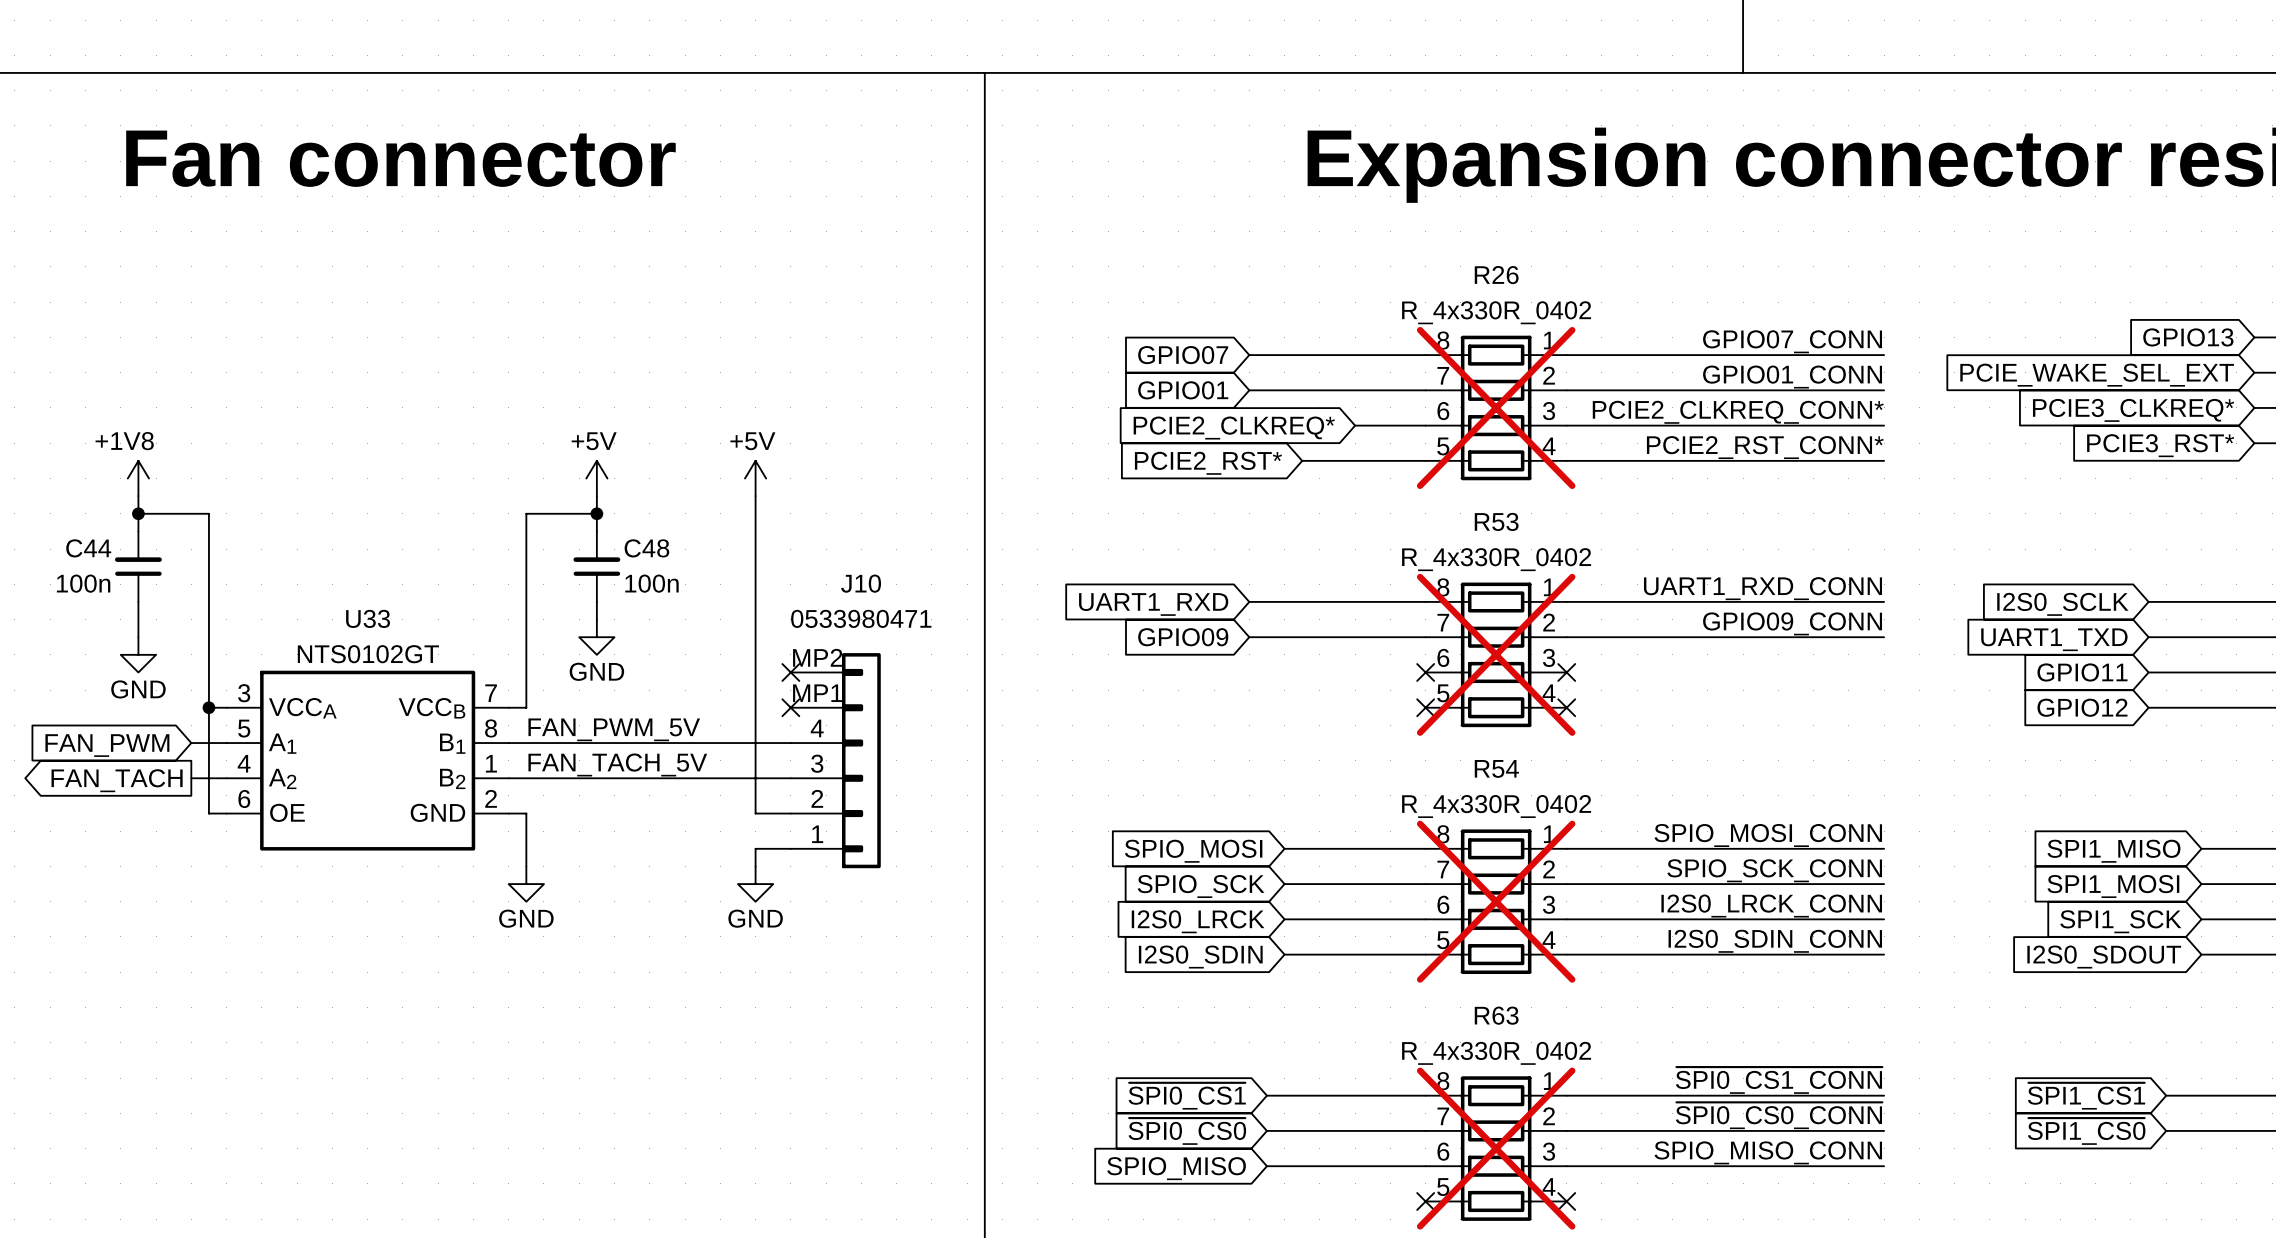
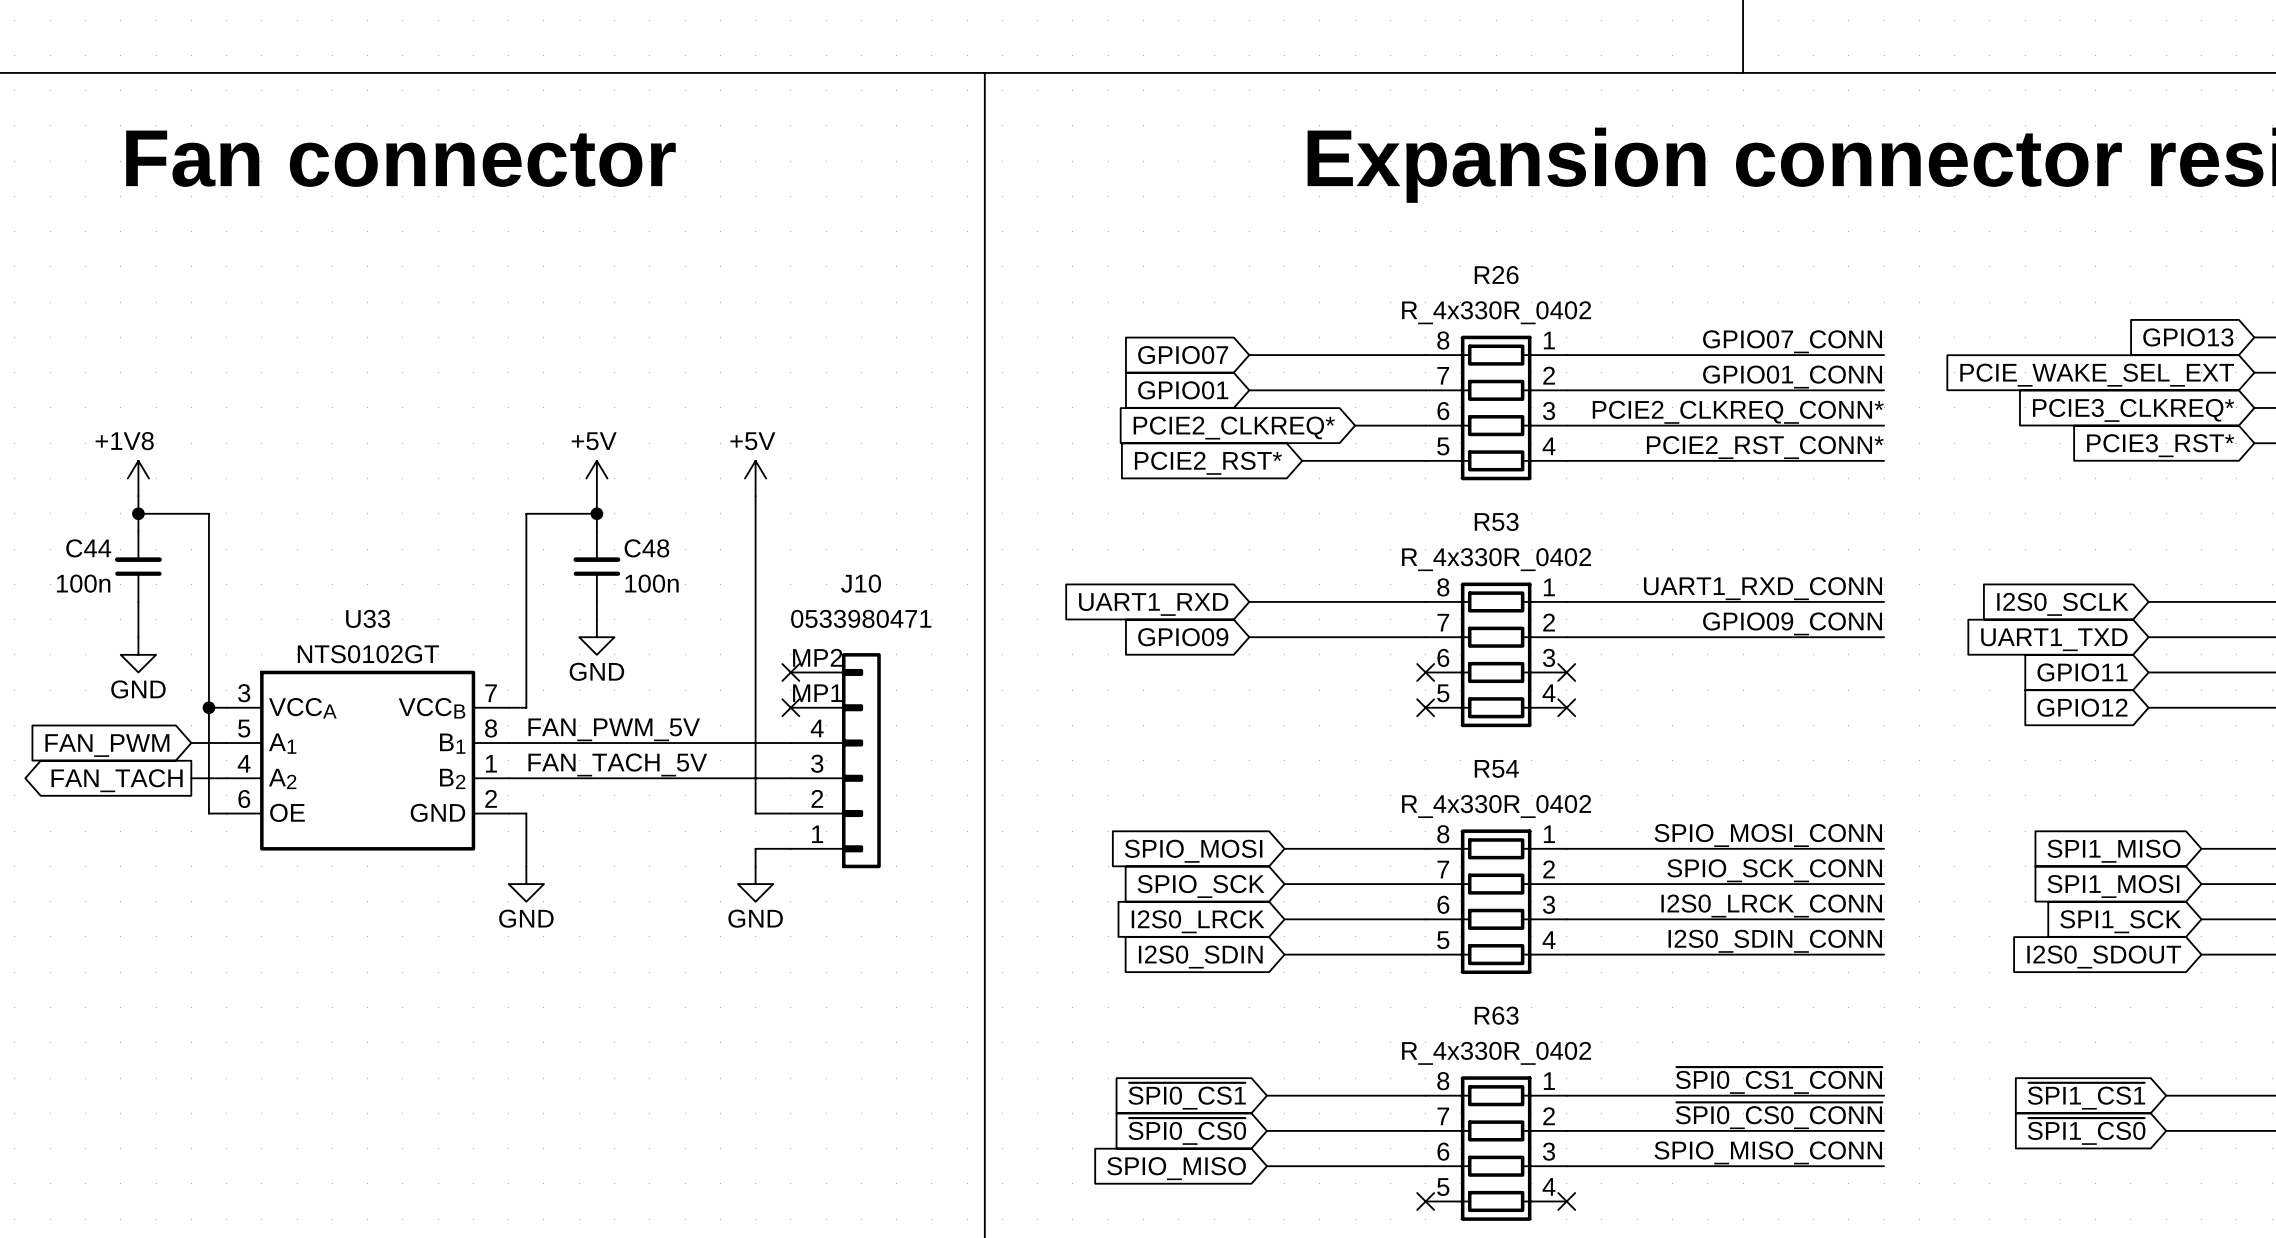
R26 do-not-place cross: (1496, 407) -> none
R53 do-not-place cross: (1496, 654) -> none
R54 do-not-place cross: (1496, 901) -> none
R63 do-not-place cross: (1496, 1148) -> none

